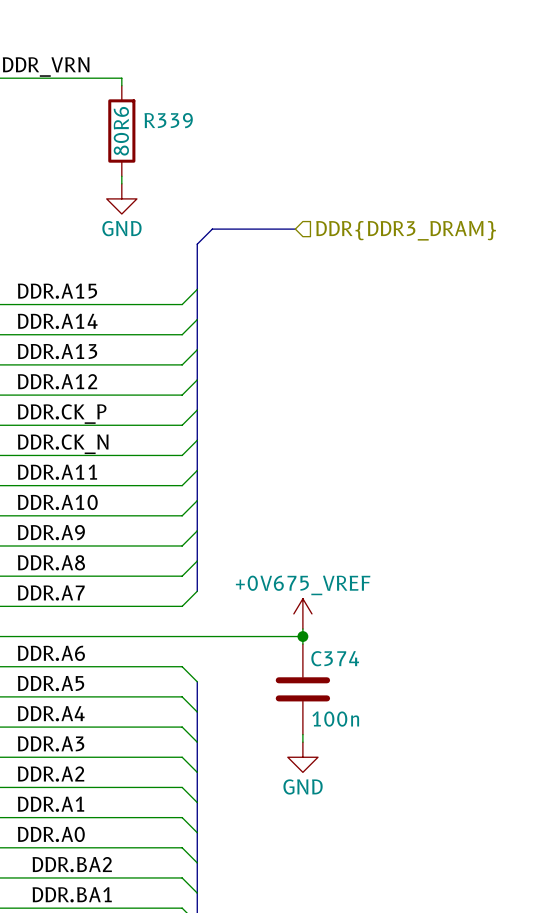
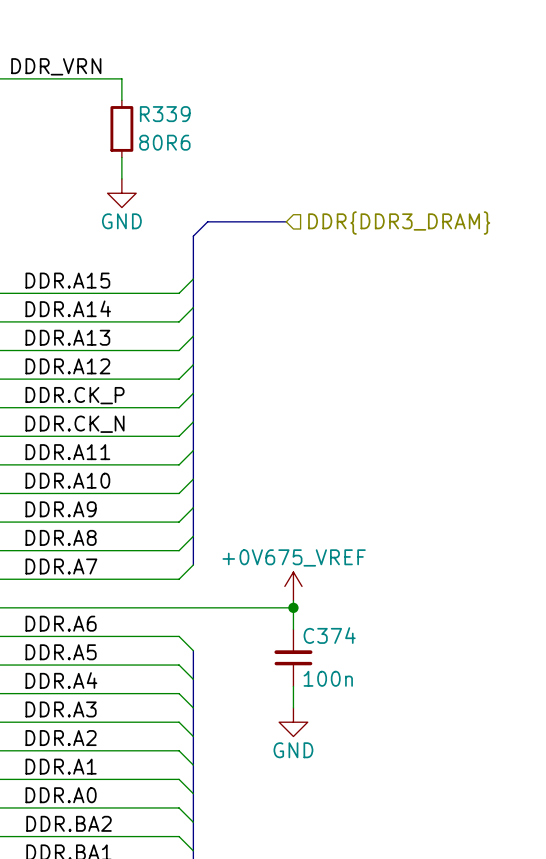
R339 symbol: [108, 85, 136, 177] -> [110, 100, 134, 158]
R339 text position: 80R6 (121, 131) -> 80R6 (164, 142)
C374 symbol: [275, 644, 331, 735] -> [274, 629, 313, 687]

